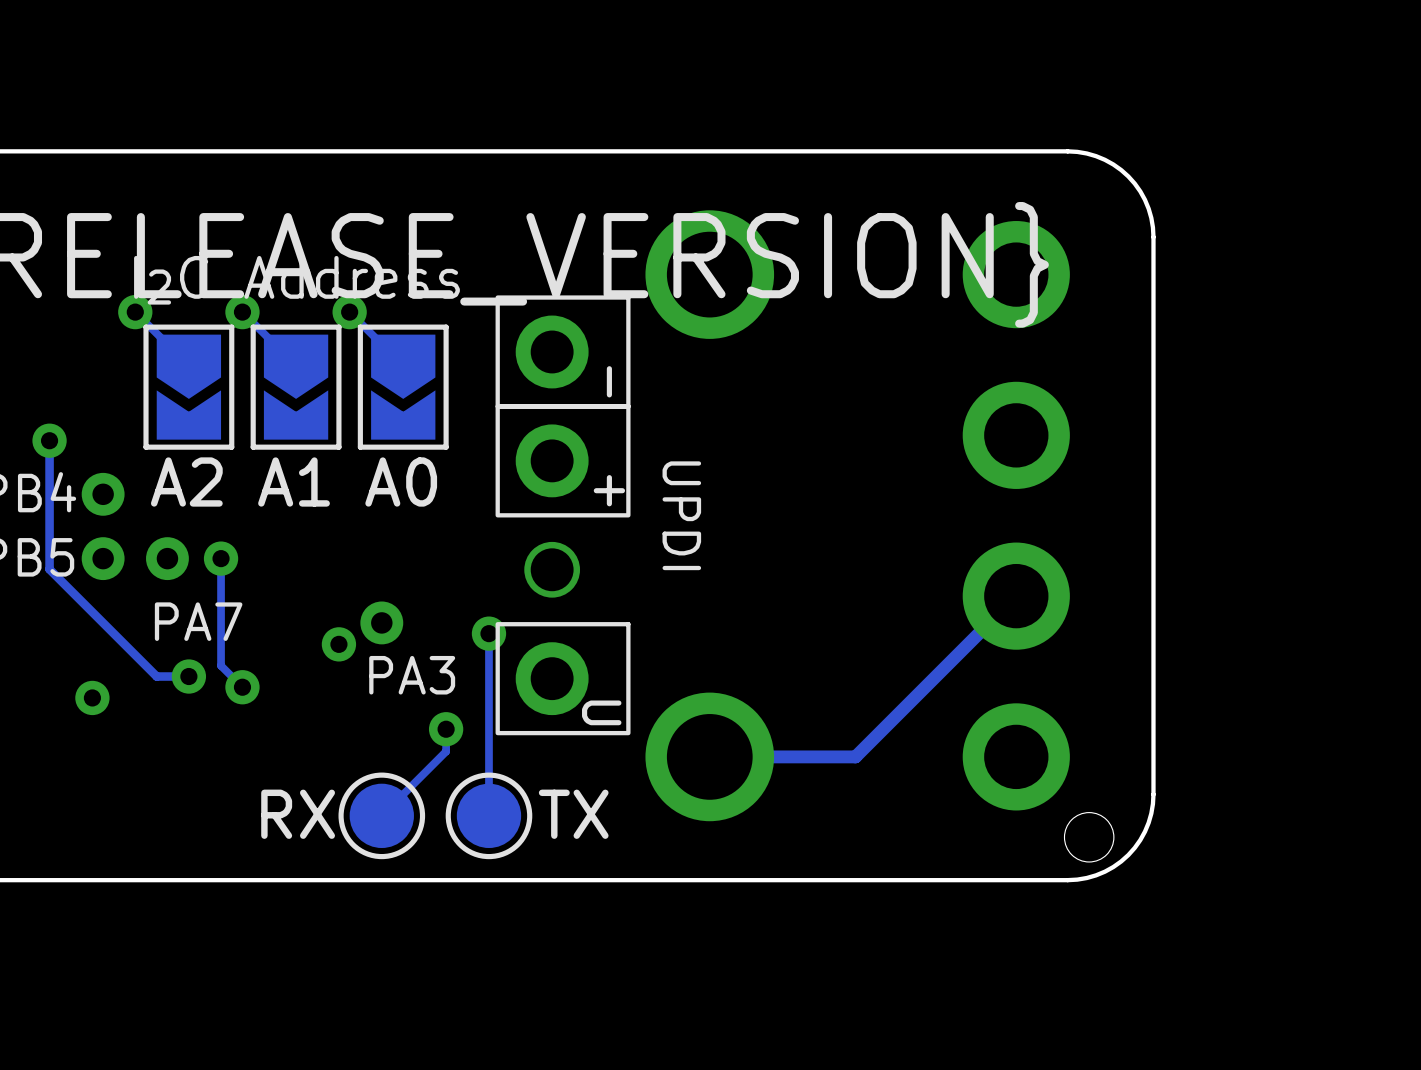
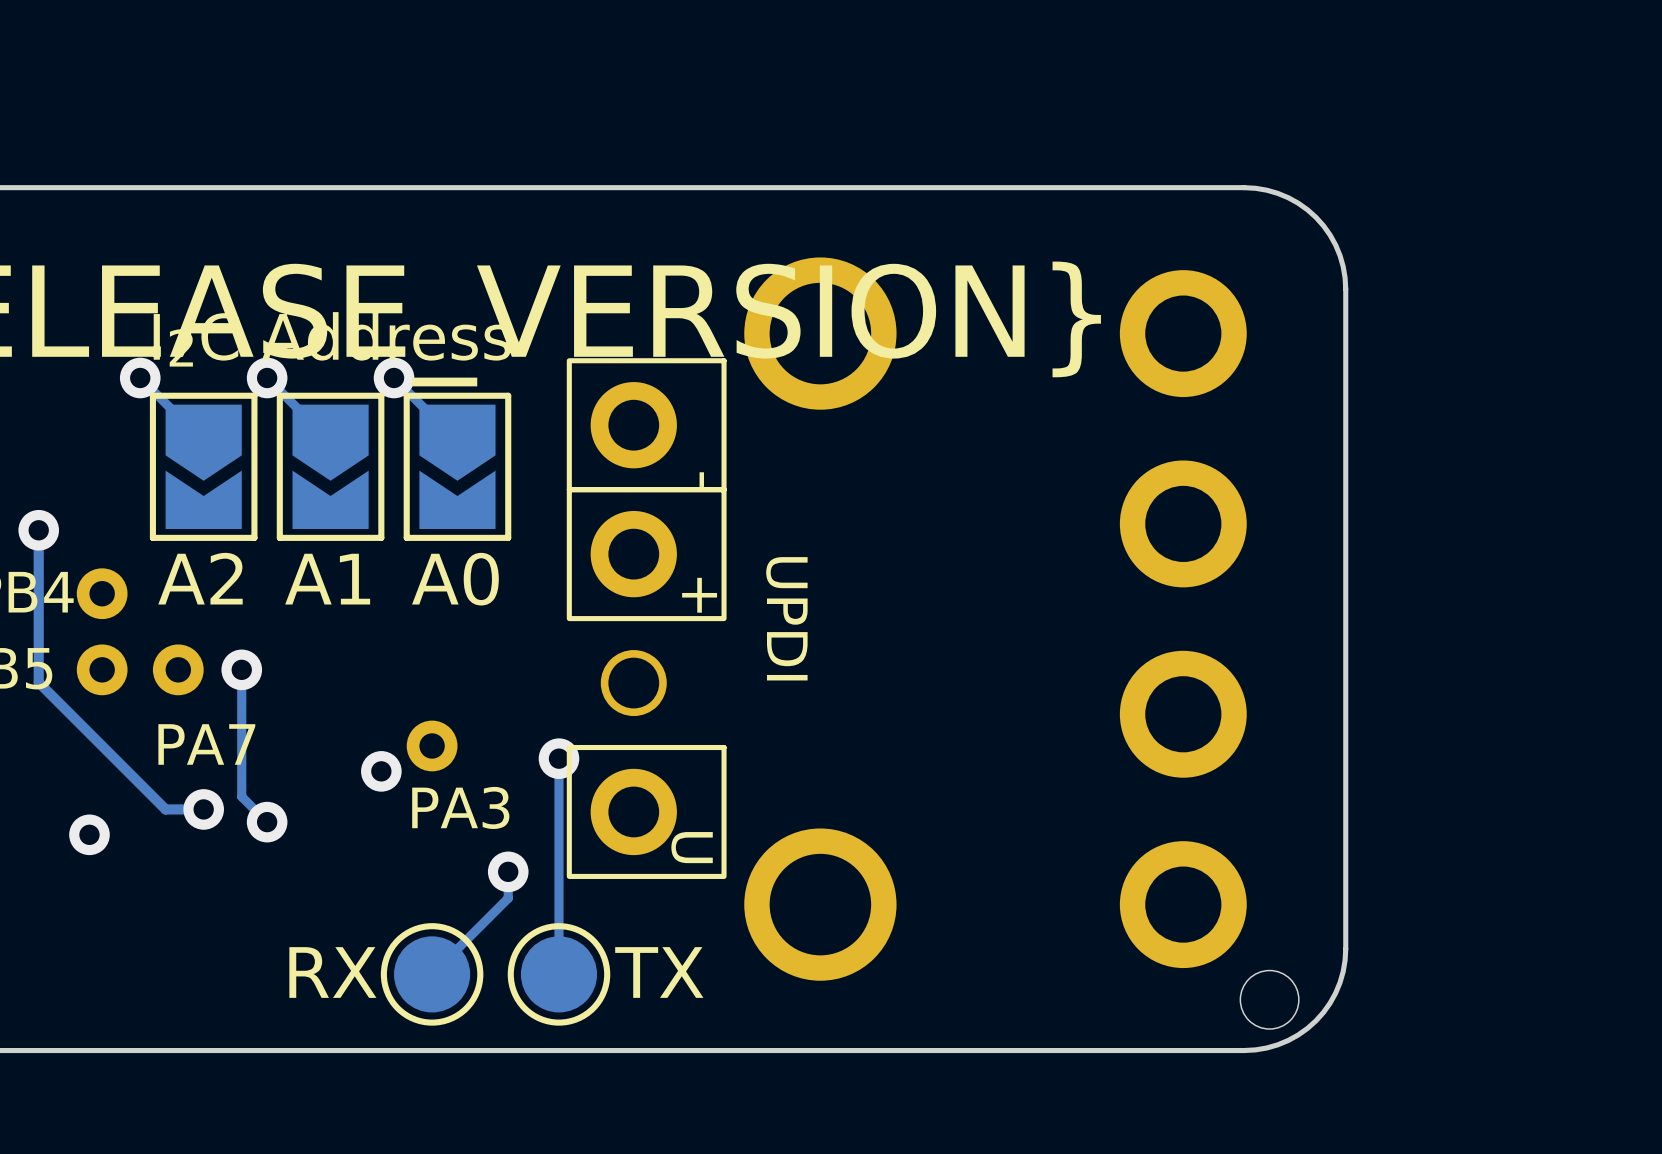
track: (1016, 596) (855, 756) (709, 756) -> none

